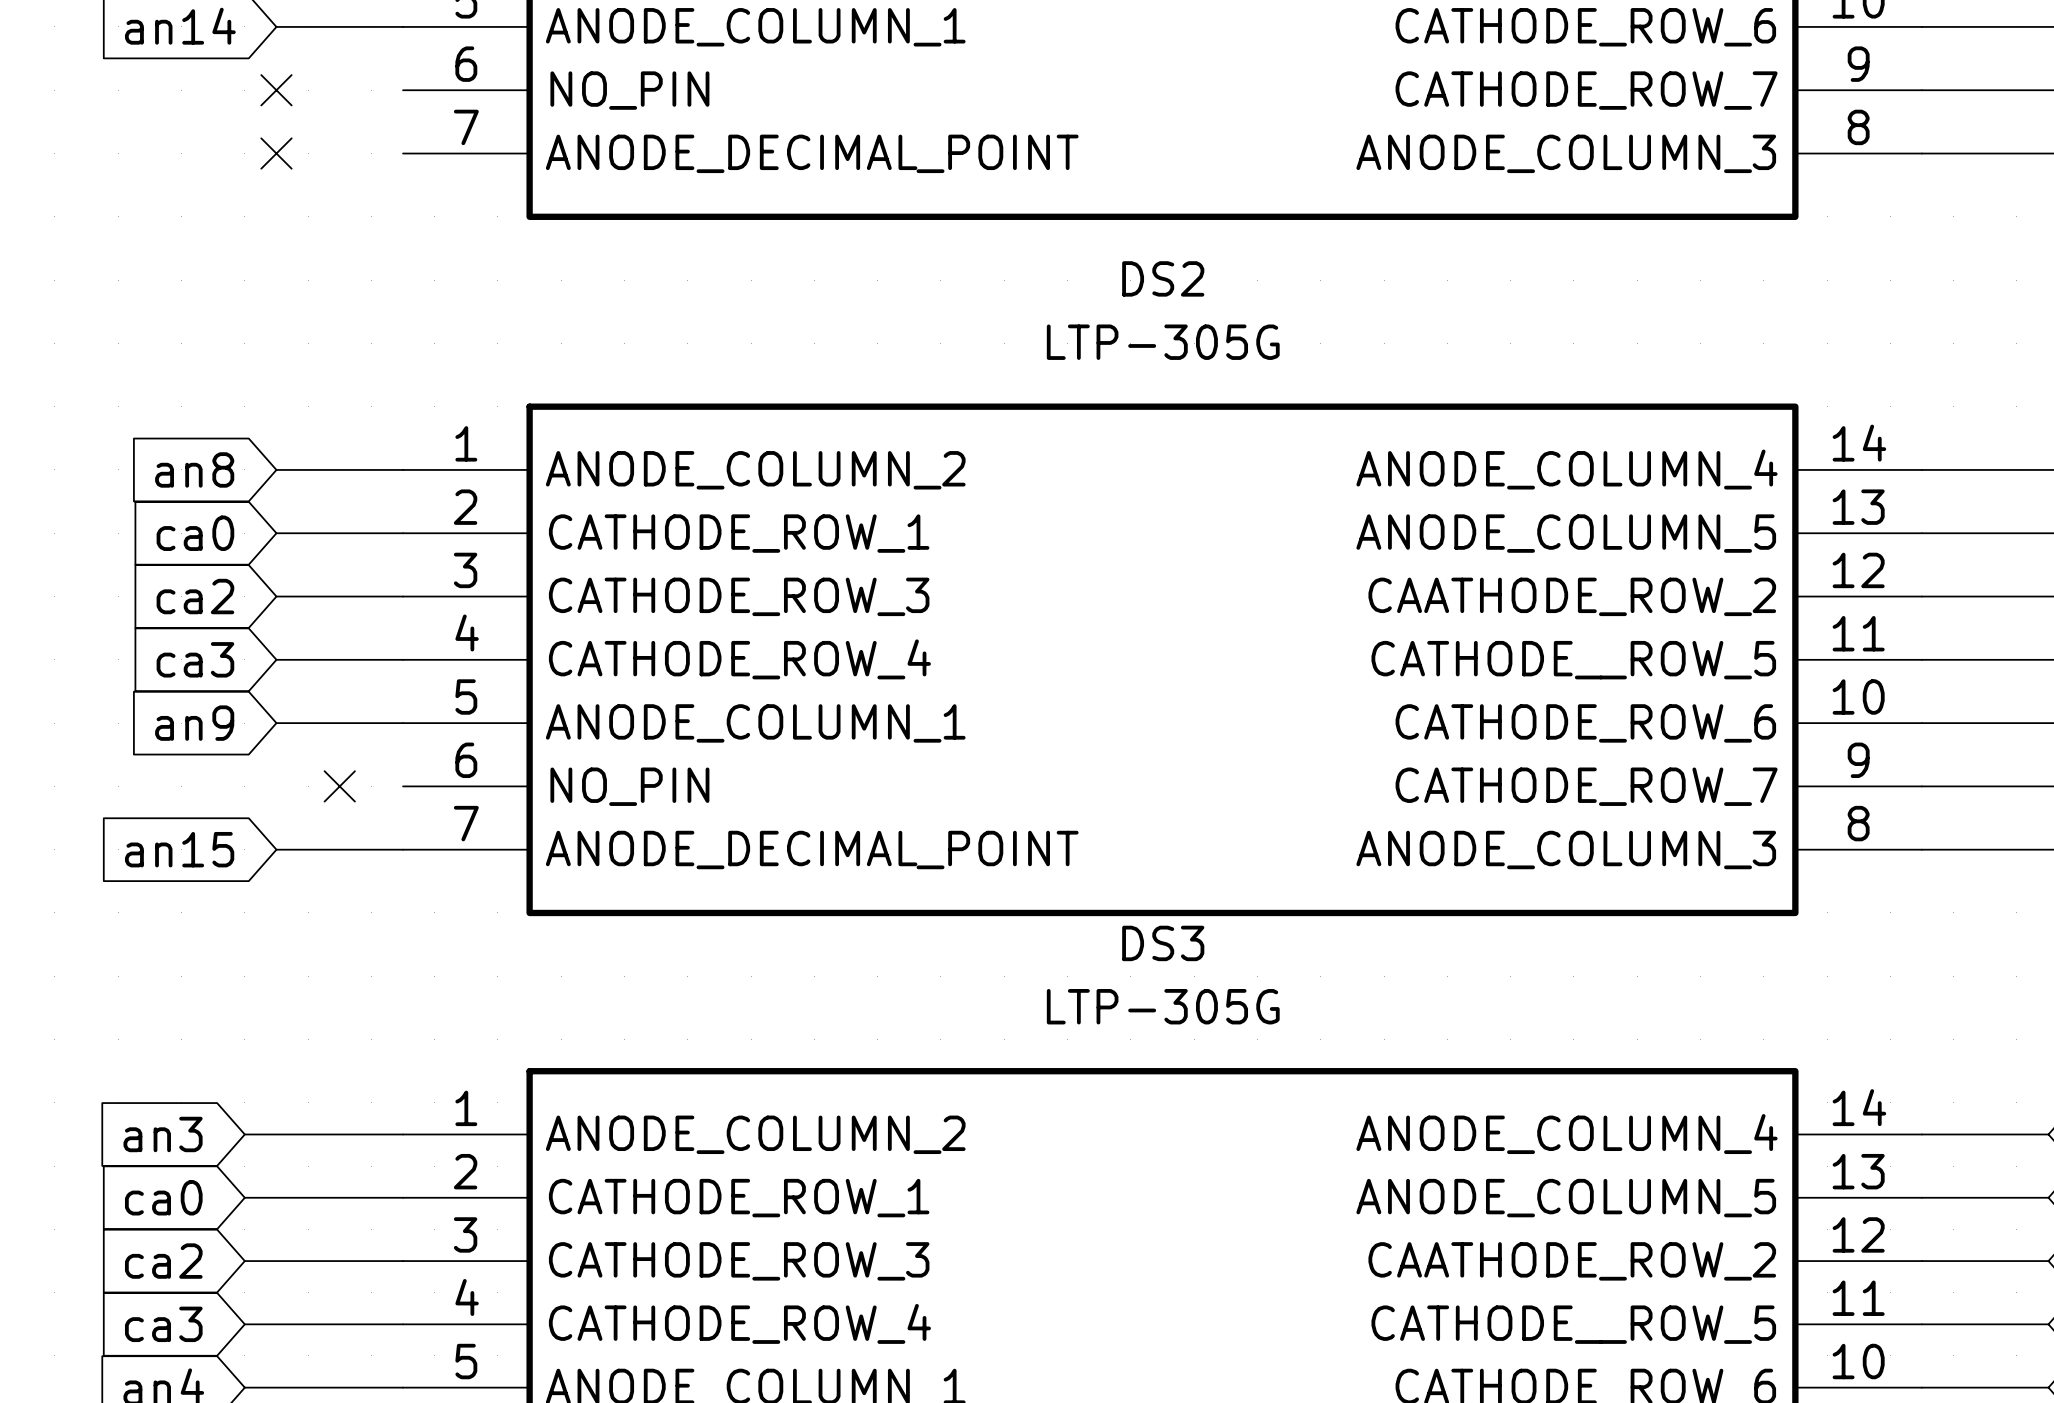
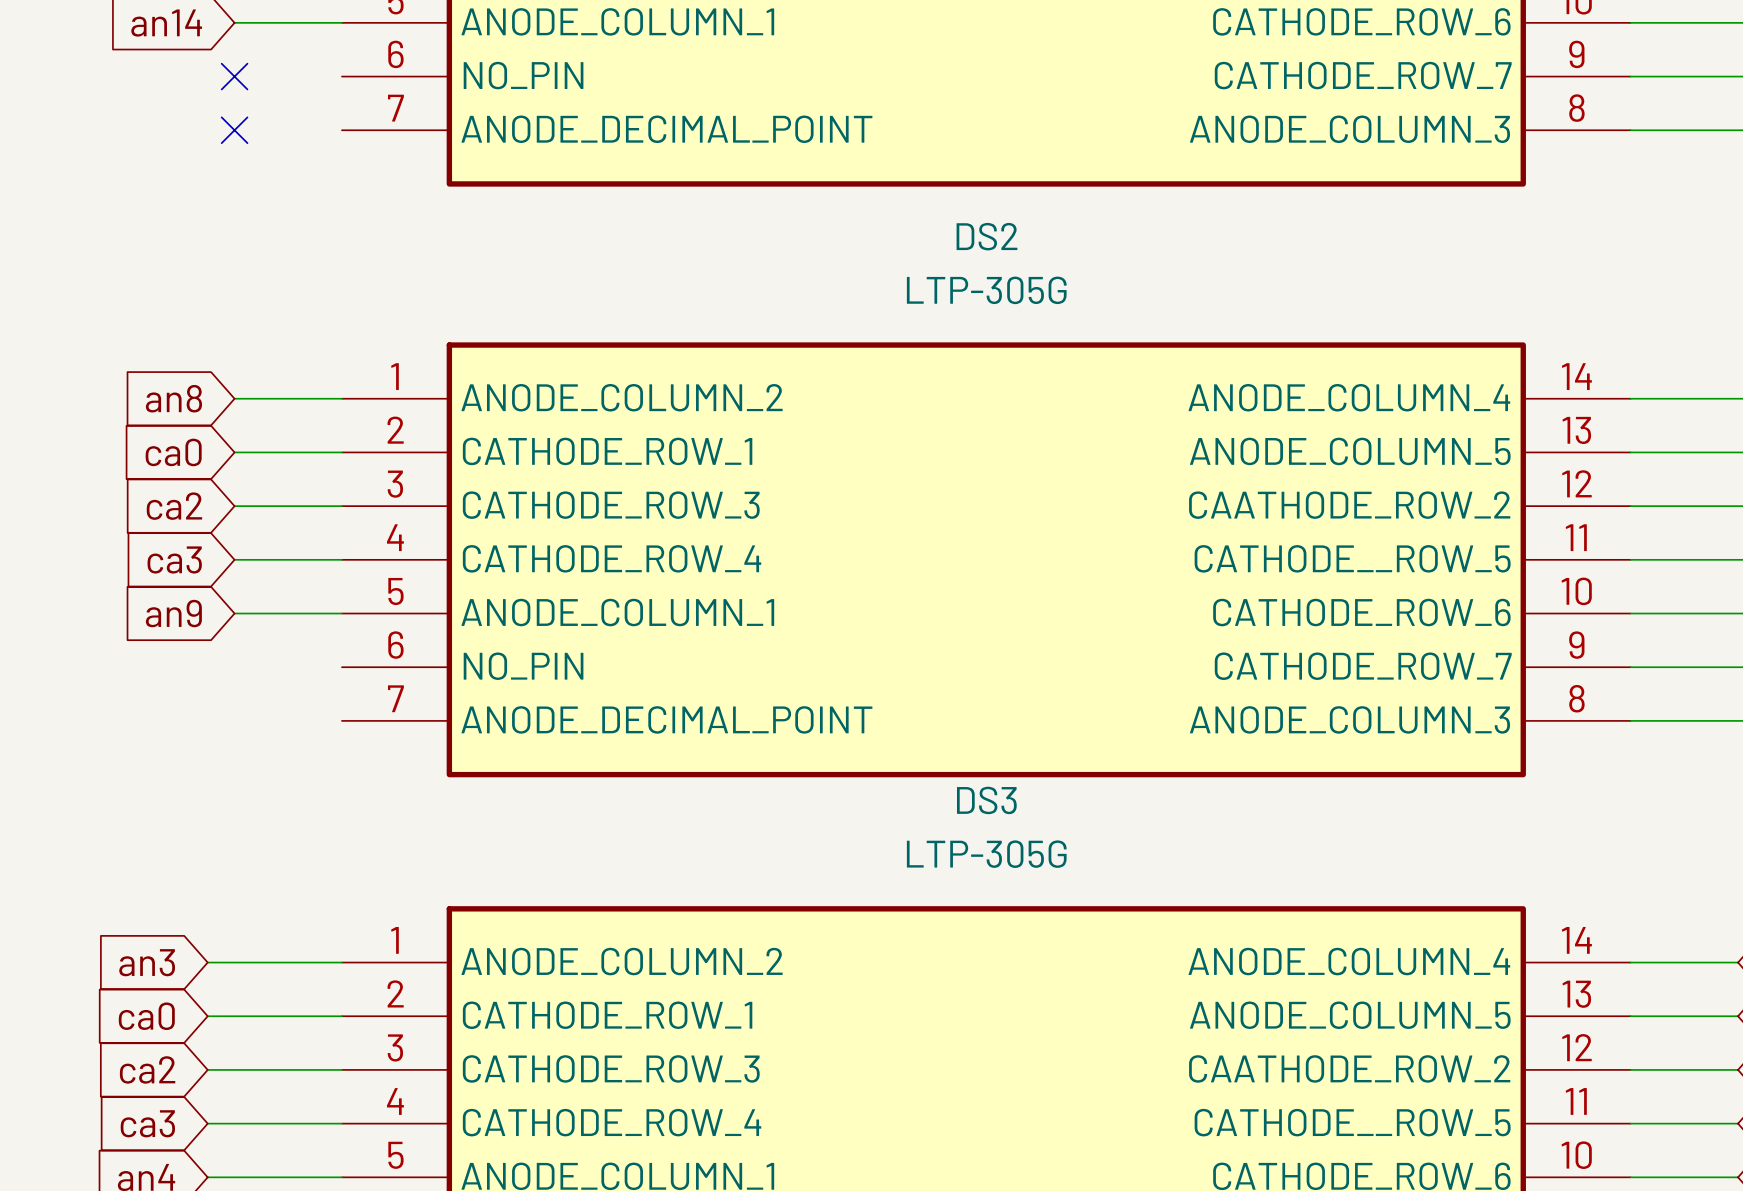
no-connect mark: (339, 786) -> none
global label: an15 (179, 849) -> none
wire: (276, 849) (403, 849) -> none

